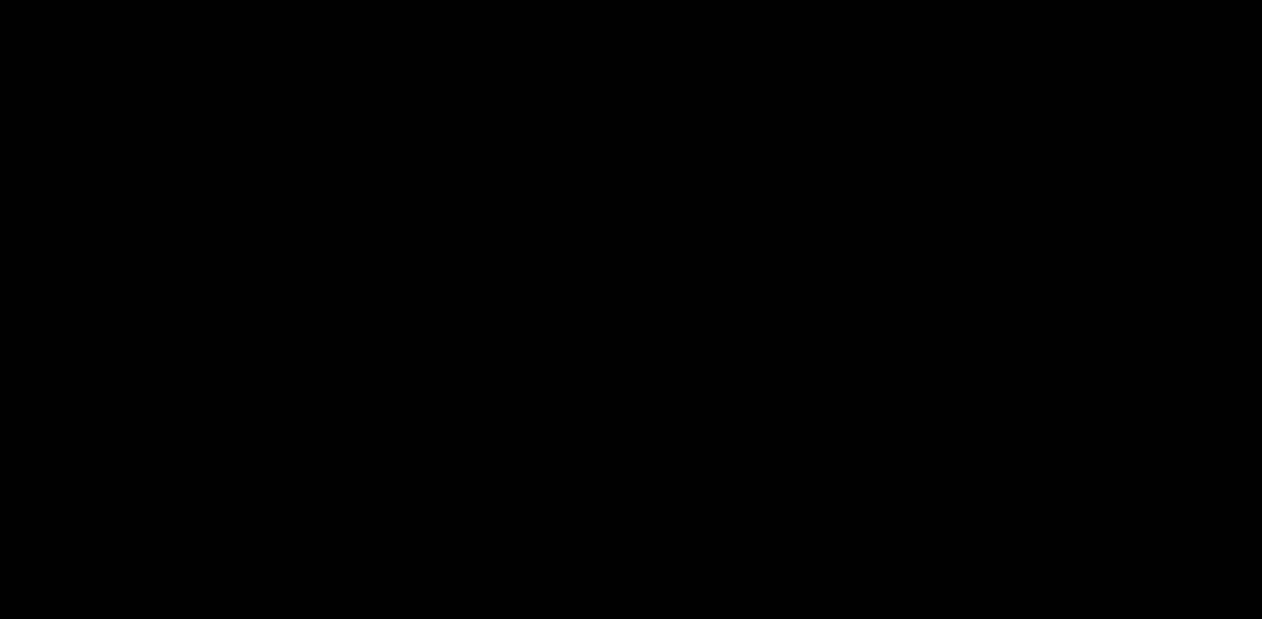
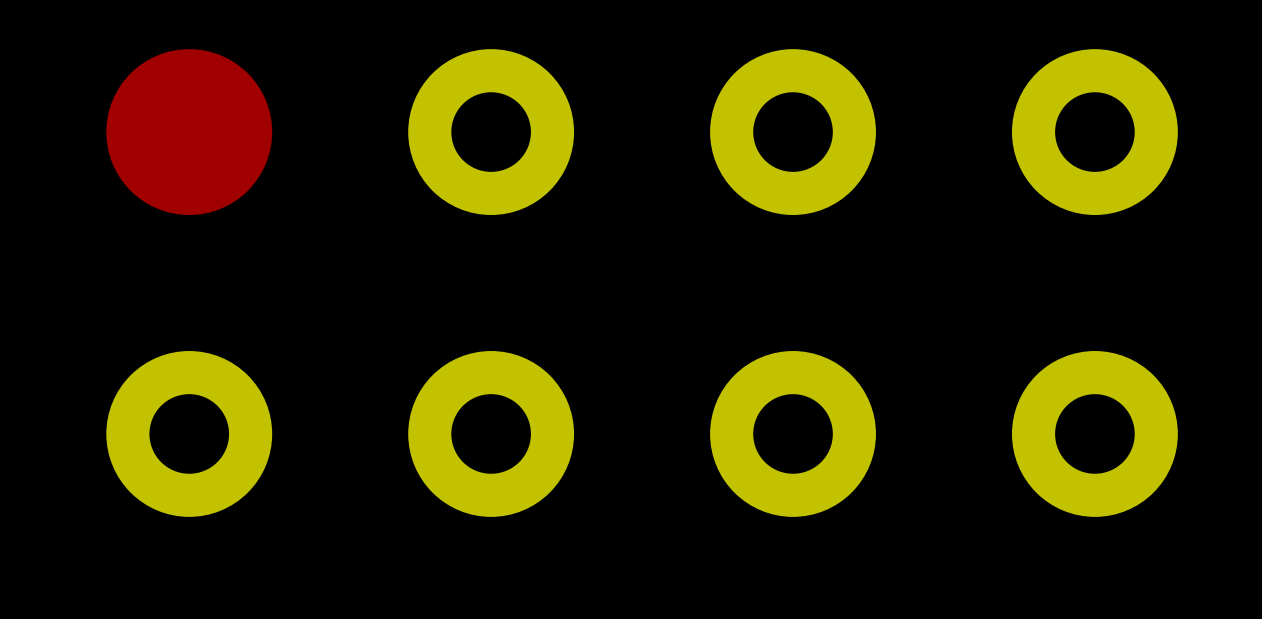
part: none -> (189, 132)
part: none -> (491, 132)
part: none -> (793, 132)
part: none -> (1094, 132)
part: none -> (189, 433)
part: none -> (491, 433)
part: none -> (793, 433)
part: none -> (1094, 433)

